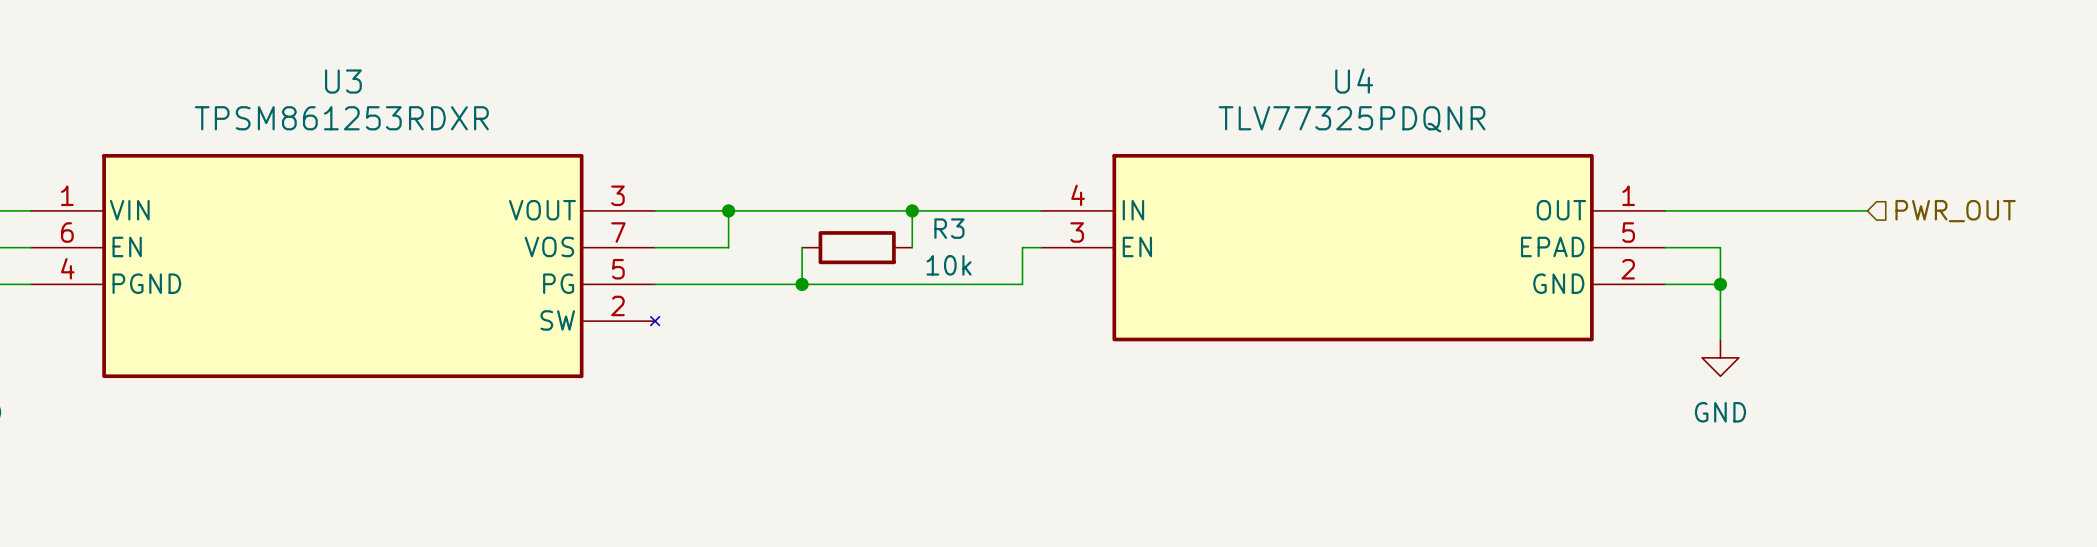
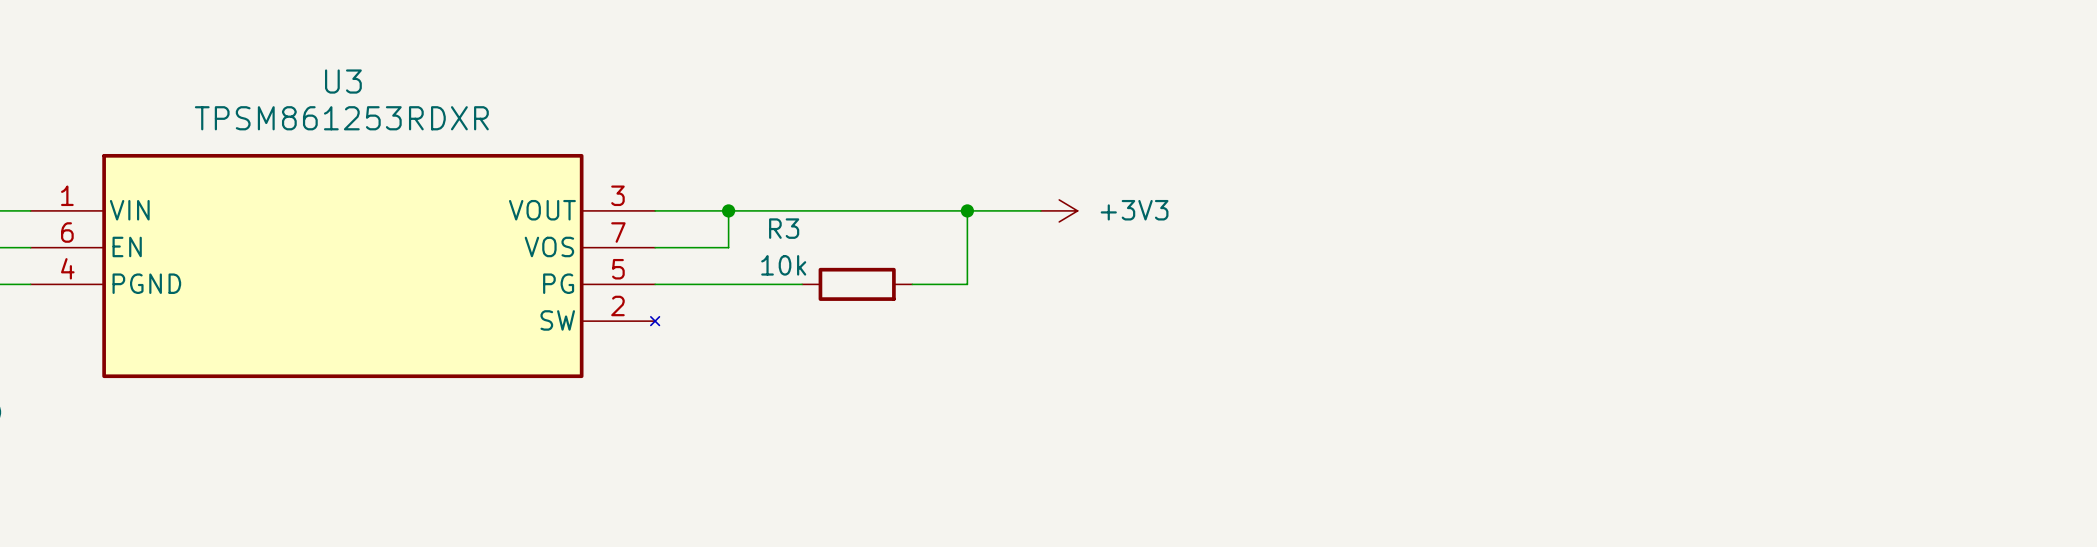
wire: (912, 210) (912, 247) -> none
junction position: (912, 210) -> (967, 210)
power symbol: none -> +3V3 (1059, 210)
wire: (1665, 210) (1867, 210) -> none
hierarchical label: PWR_OUT (1955, 211) -> none
R3 name position: R3 (949, 228) -> R3 (784, 228)
wire: (802, 247) (802, 284) (912, 284) -> none
R3 position: (857, 247) -> (857, 284)
wire: (1040, 247) (1022, 247) (1022, 284) (967, 284) -> (967, 210) (967, 284)
U4: TLV77325PDQNR (1353, 247) -> none
wire: (1665, 247) (1720, 247) (1720, 339) -> none
R3 value position: 10k (949, 265) -> 10k (783, 265)
junction: (802, 284) -> none
wire: (1665, 284) (1720, 284) -> none
junction: (1720, 284) -> none
power symbol: GND (1720, 357) -> none

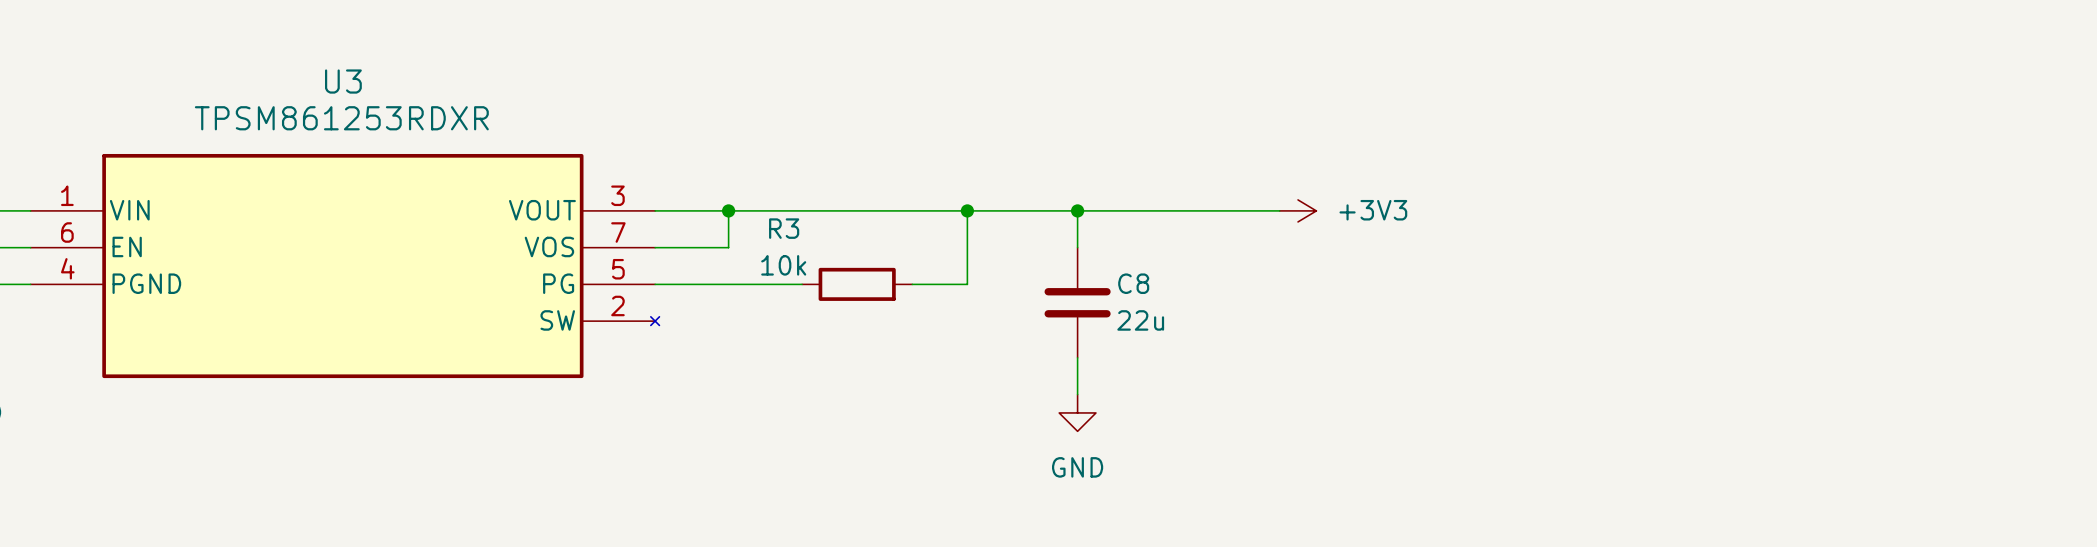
wire: none -> (1040, 210) (1279, 210)
power symbol position: +3V3 (1059, 210) -> +3V3 (1298, 210)
wire: none -> (1077, 210) (1077, 247)
junction: none -> (1077, 210)
C8: none -> 22u (1077, 302)
wire: none -> (1077, 357) (1077, 394)
power symbol: none -> GND (1077, 412)

